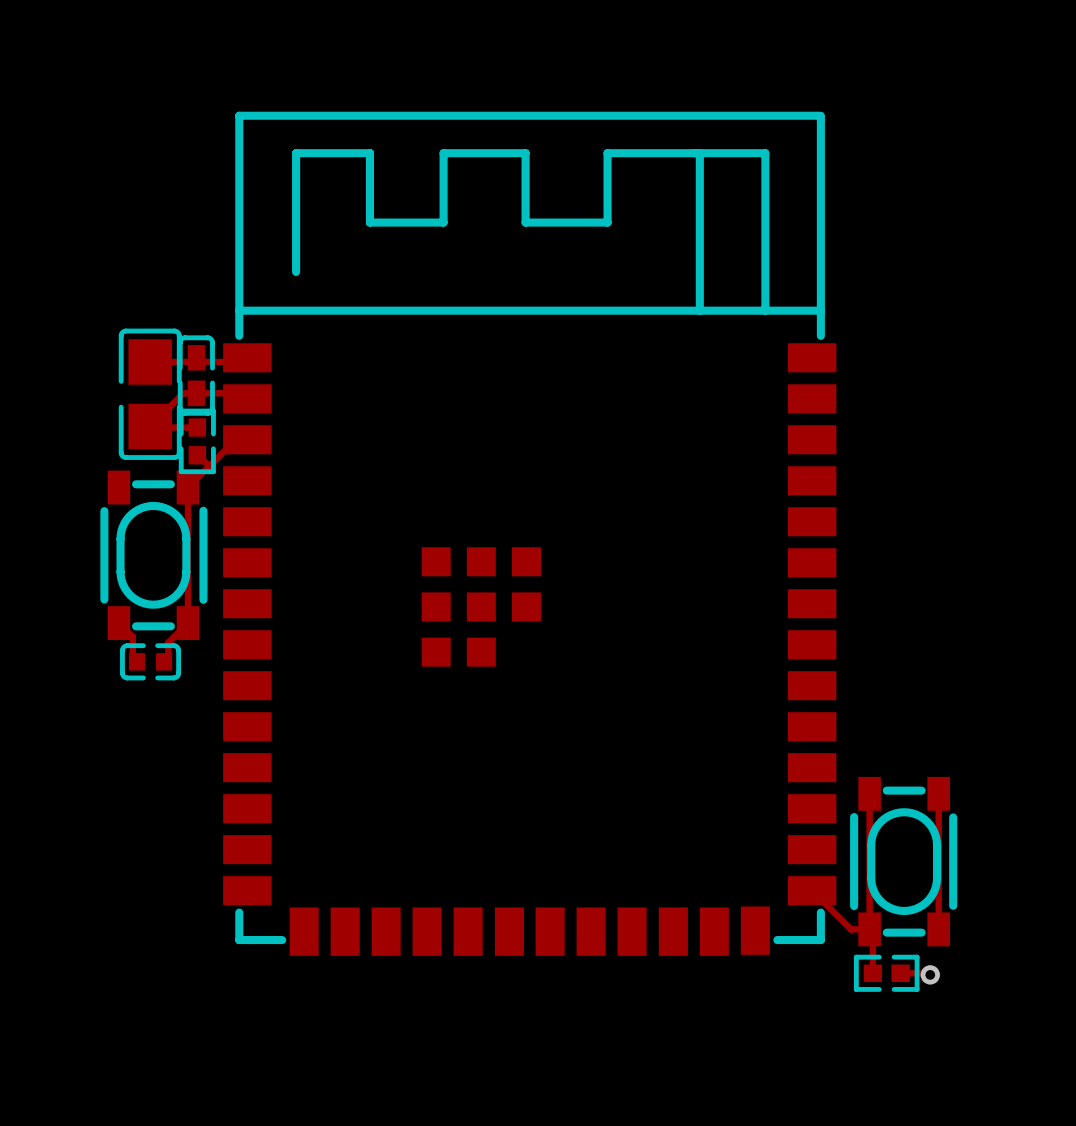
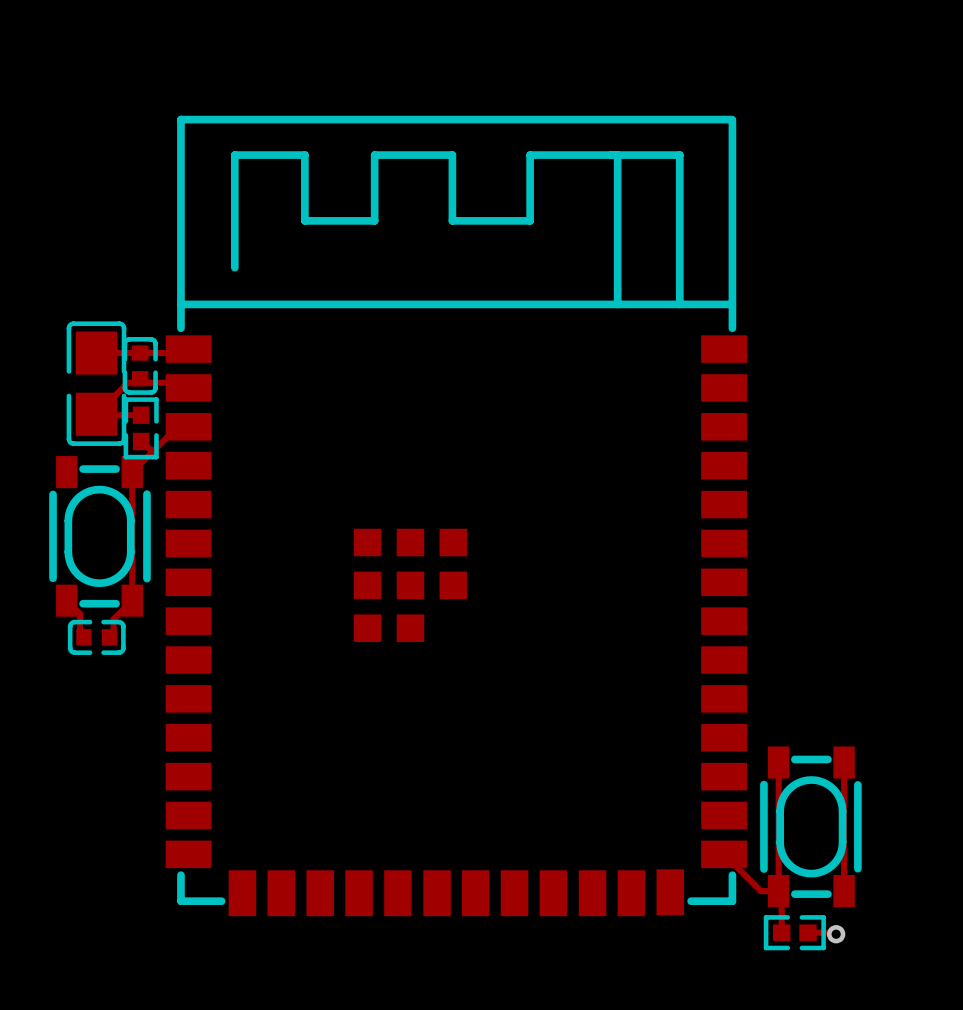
part footprint: [177, 335, 215, 416] -> [122, 337, 158, 395]

